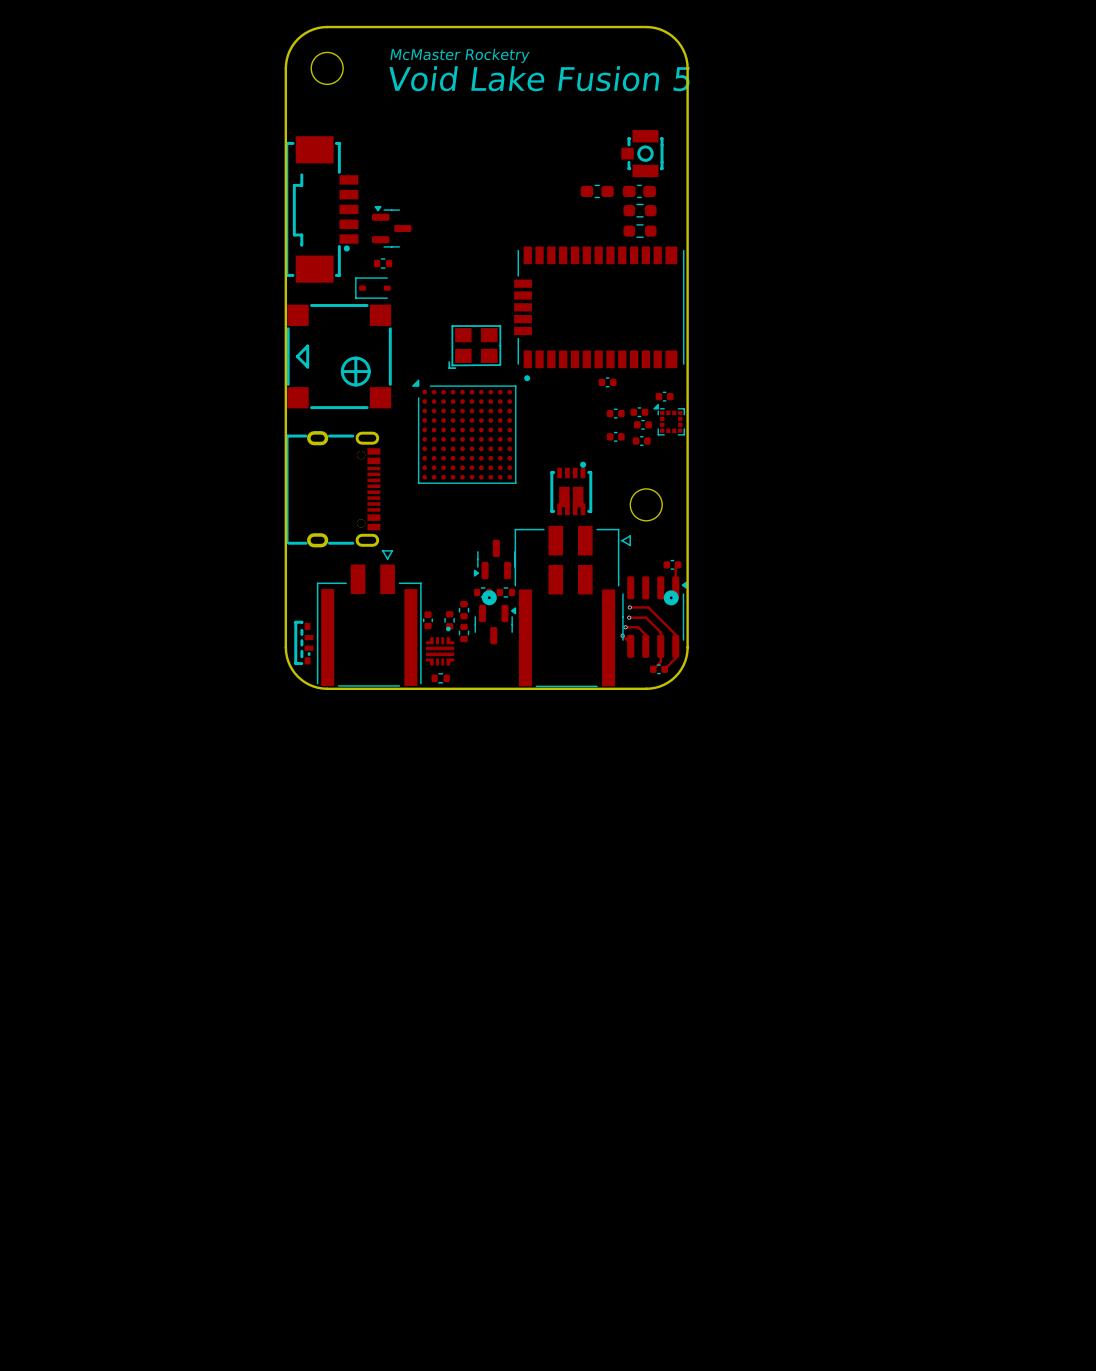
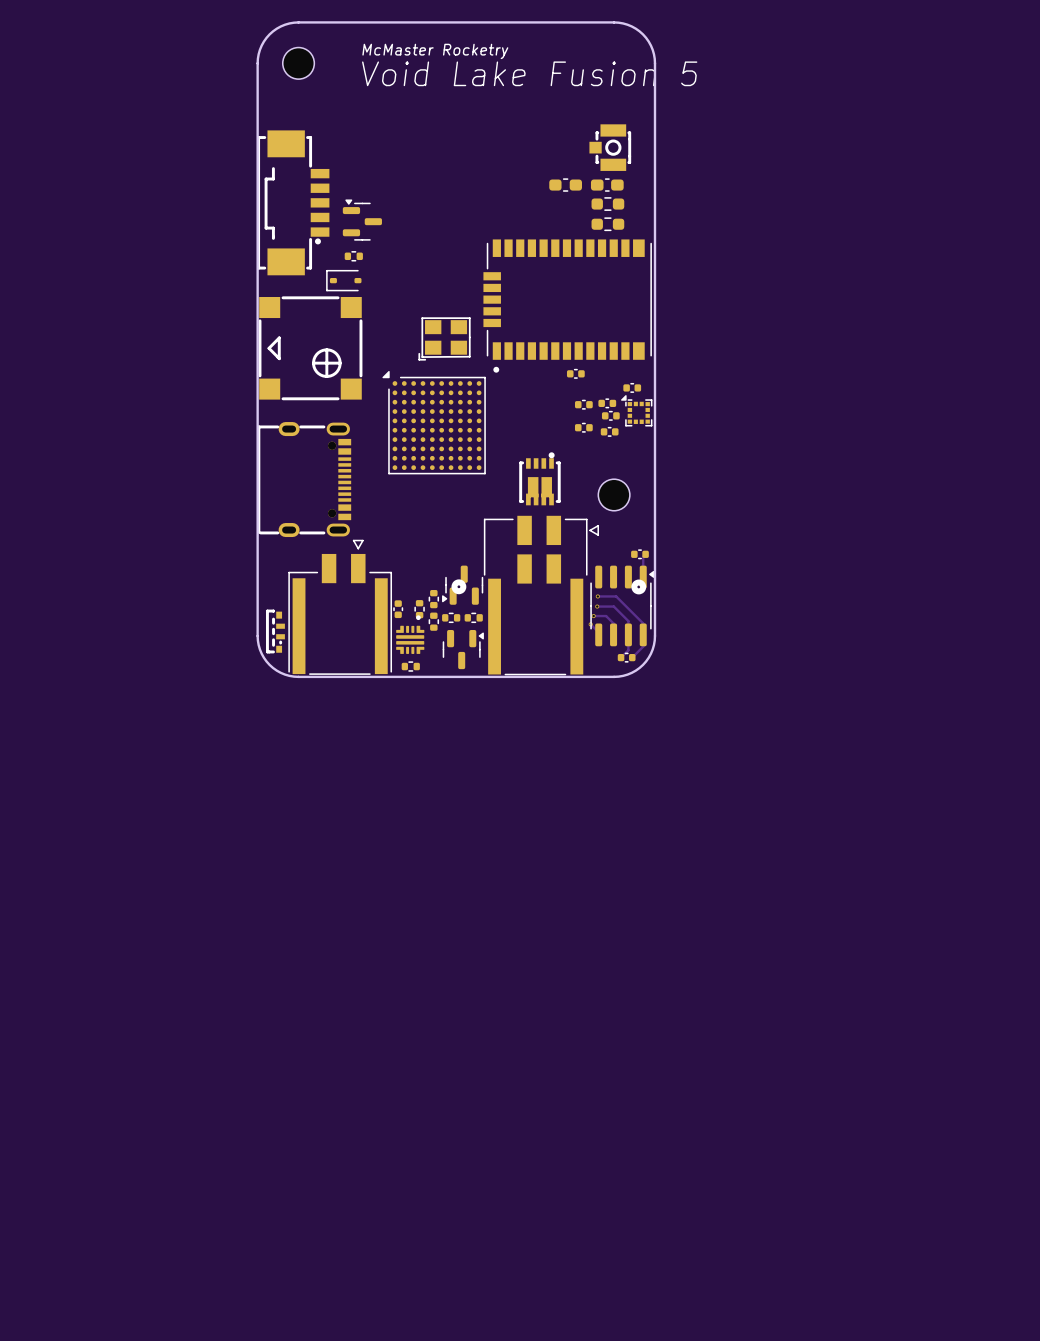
part: (494, 559) -> none
part: (483, 592) -> none
part: (505, 592) -> none
part: none -> (462, 585)
part: (495, 624) -> none
part: none -> (451, 617)
part: none -> (473, 617)
part: none -> (463, 649)

